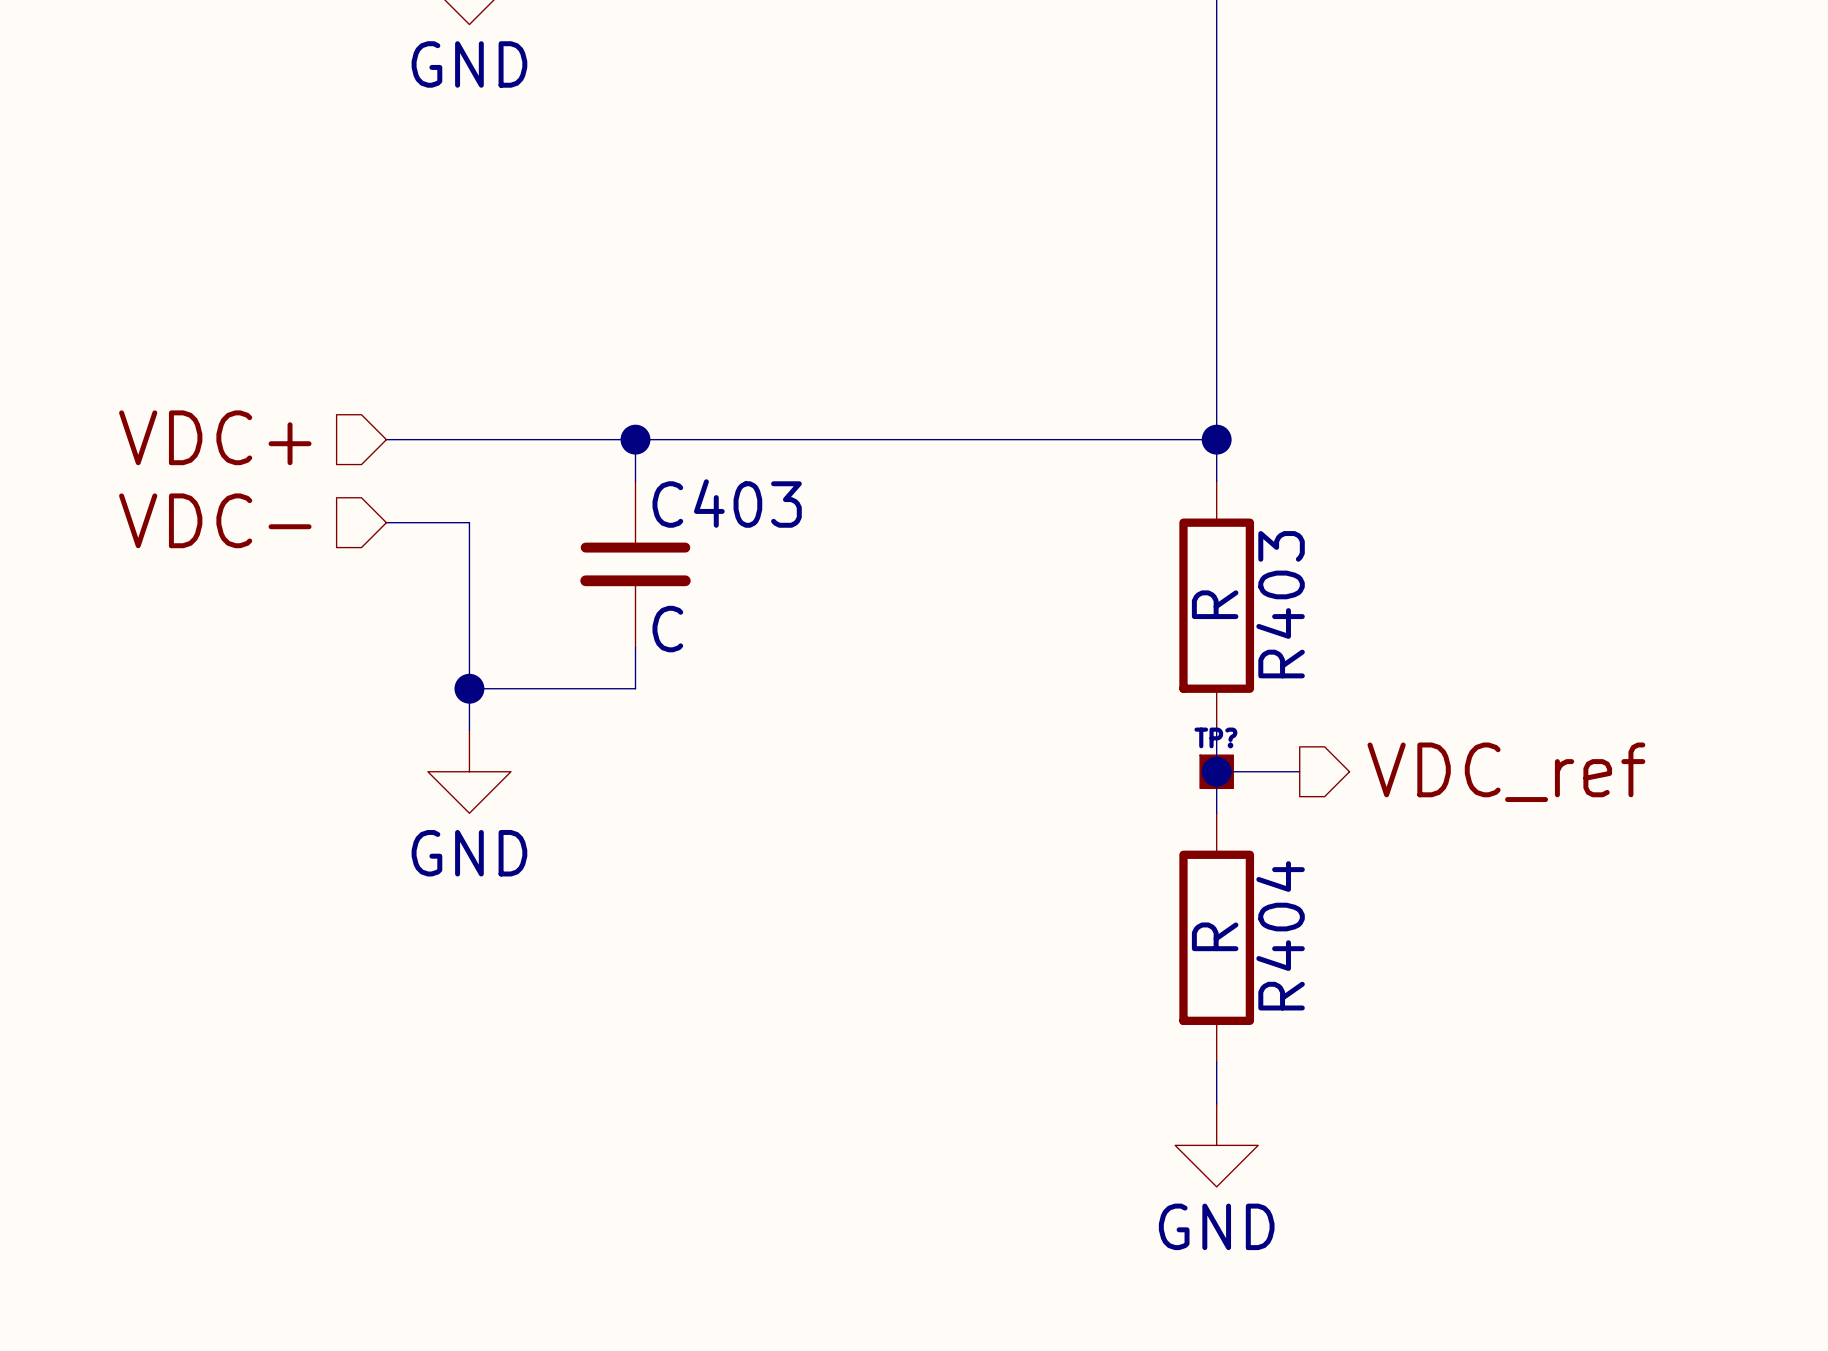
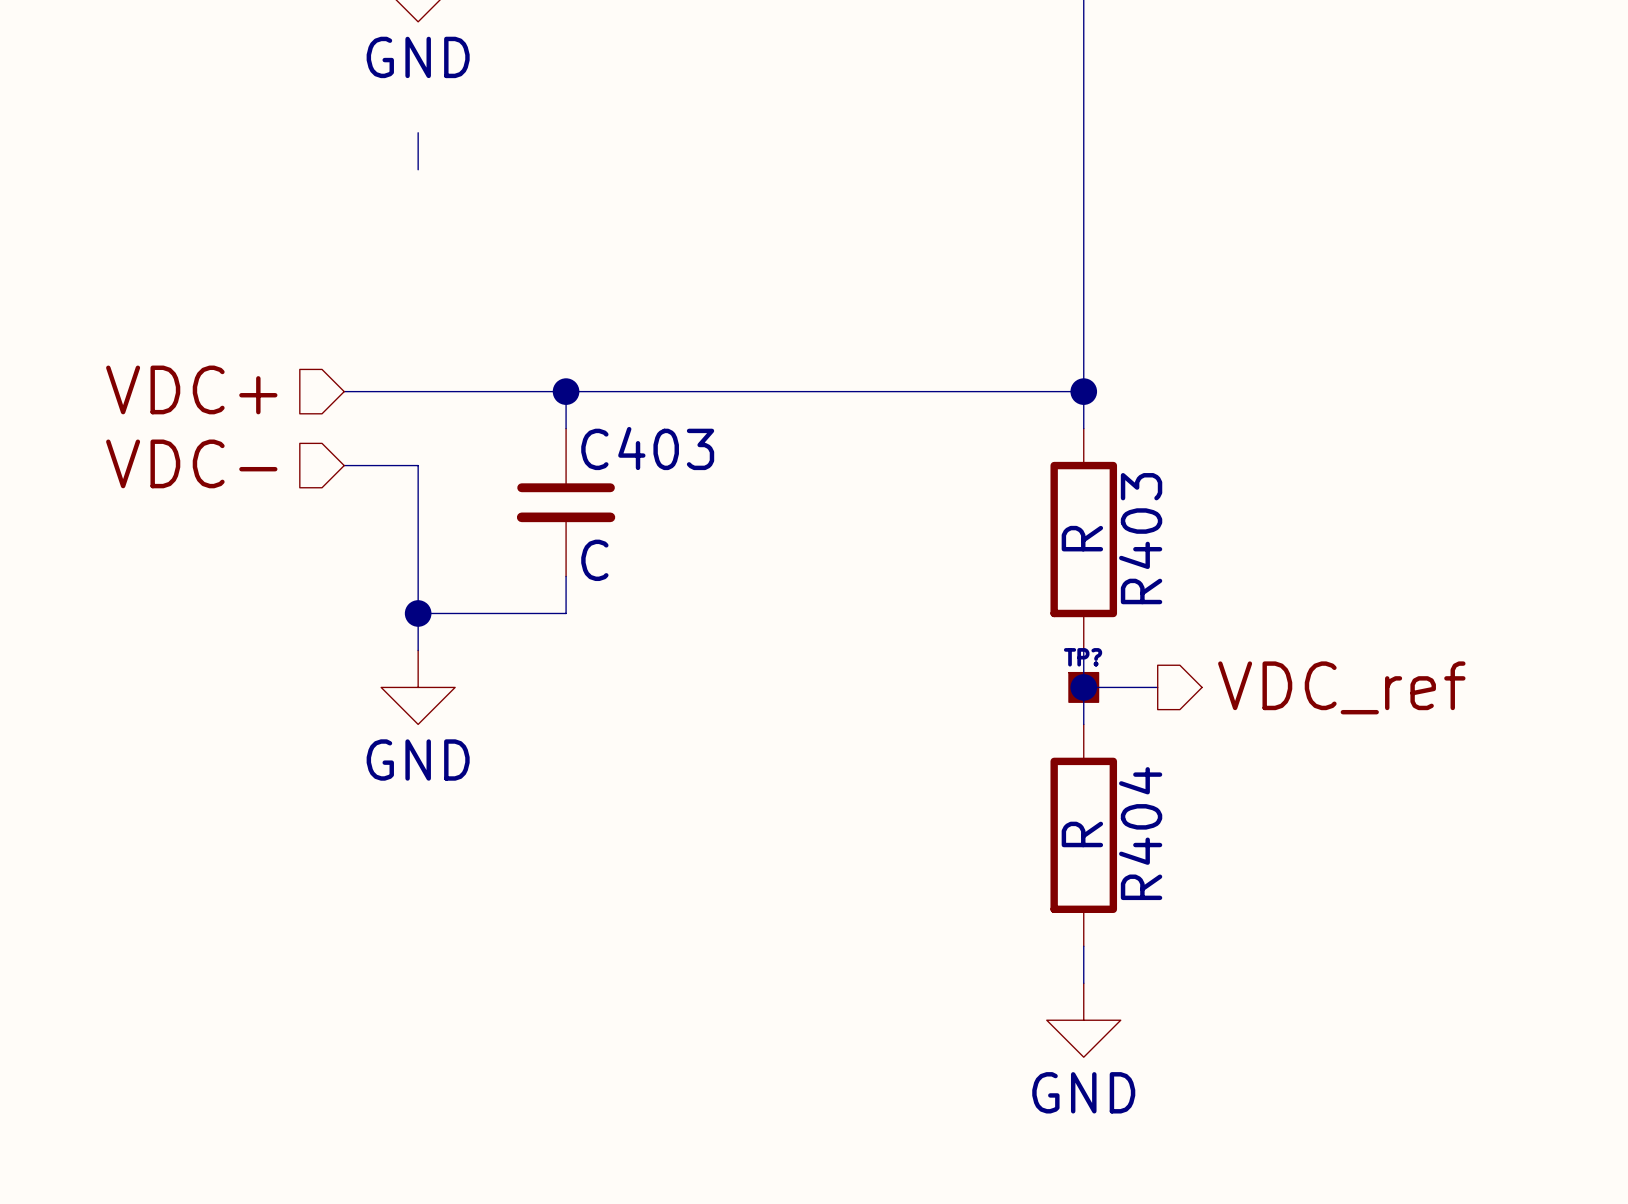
wire: none -> (418, 132) (418, 169)

